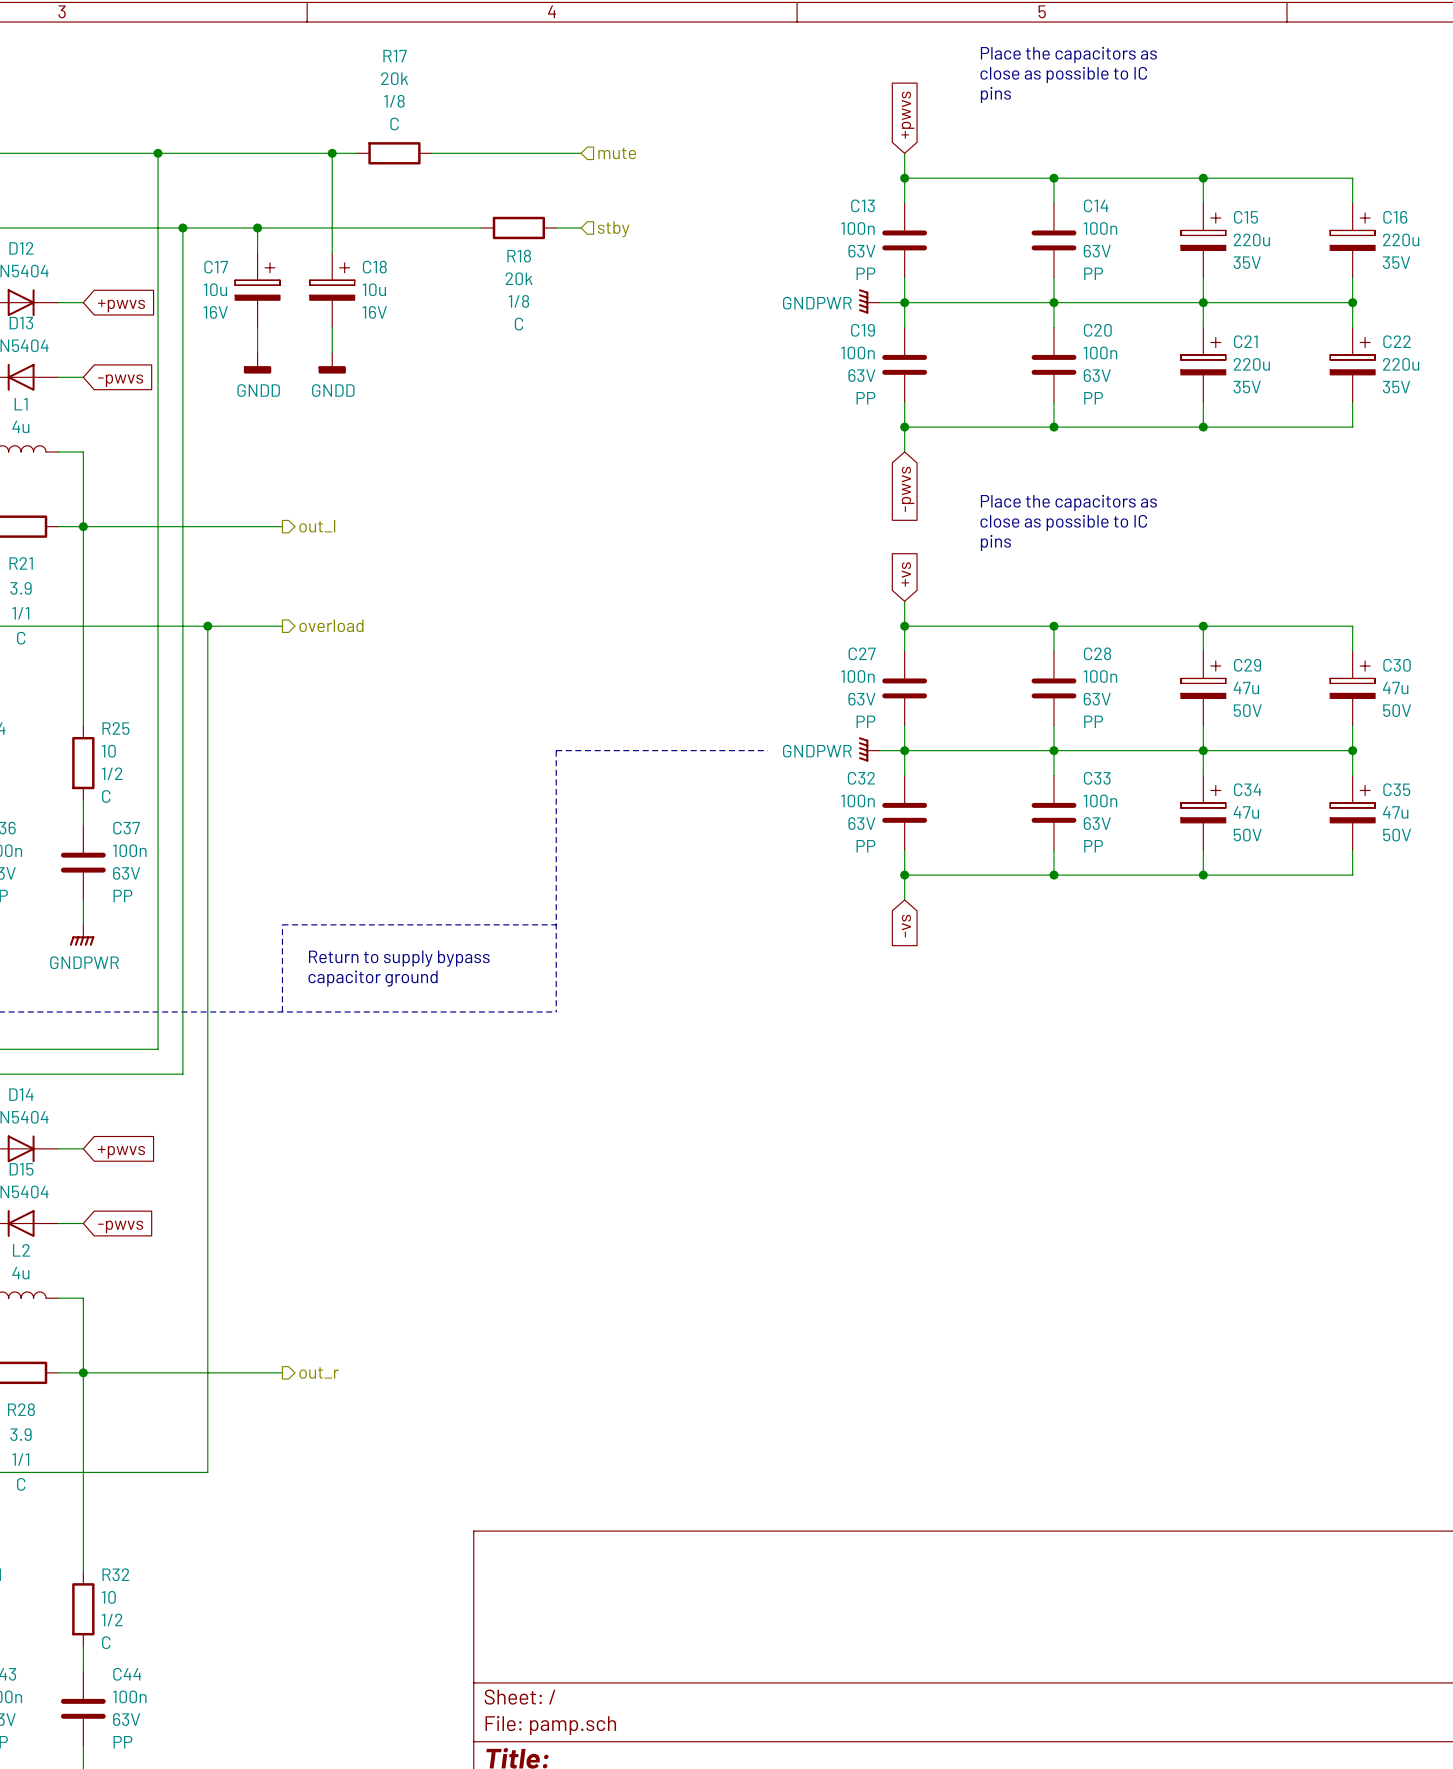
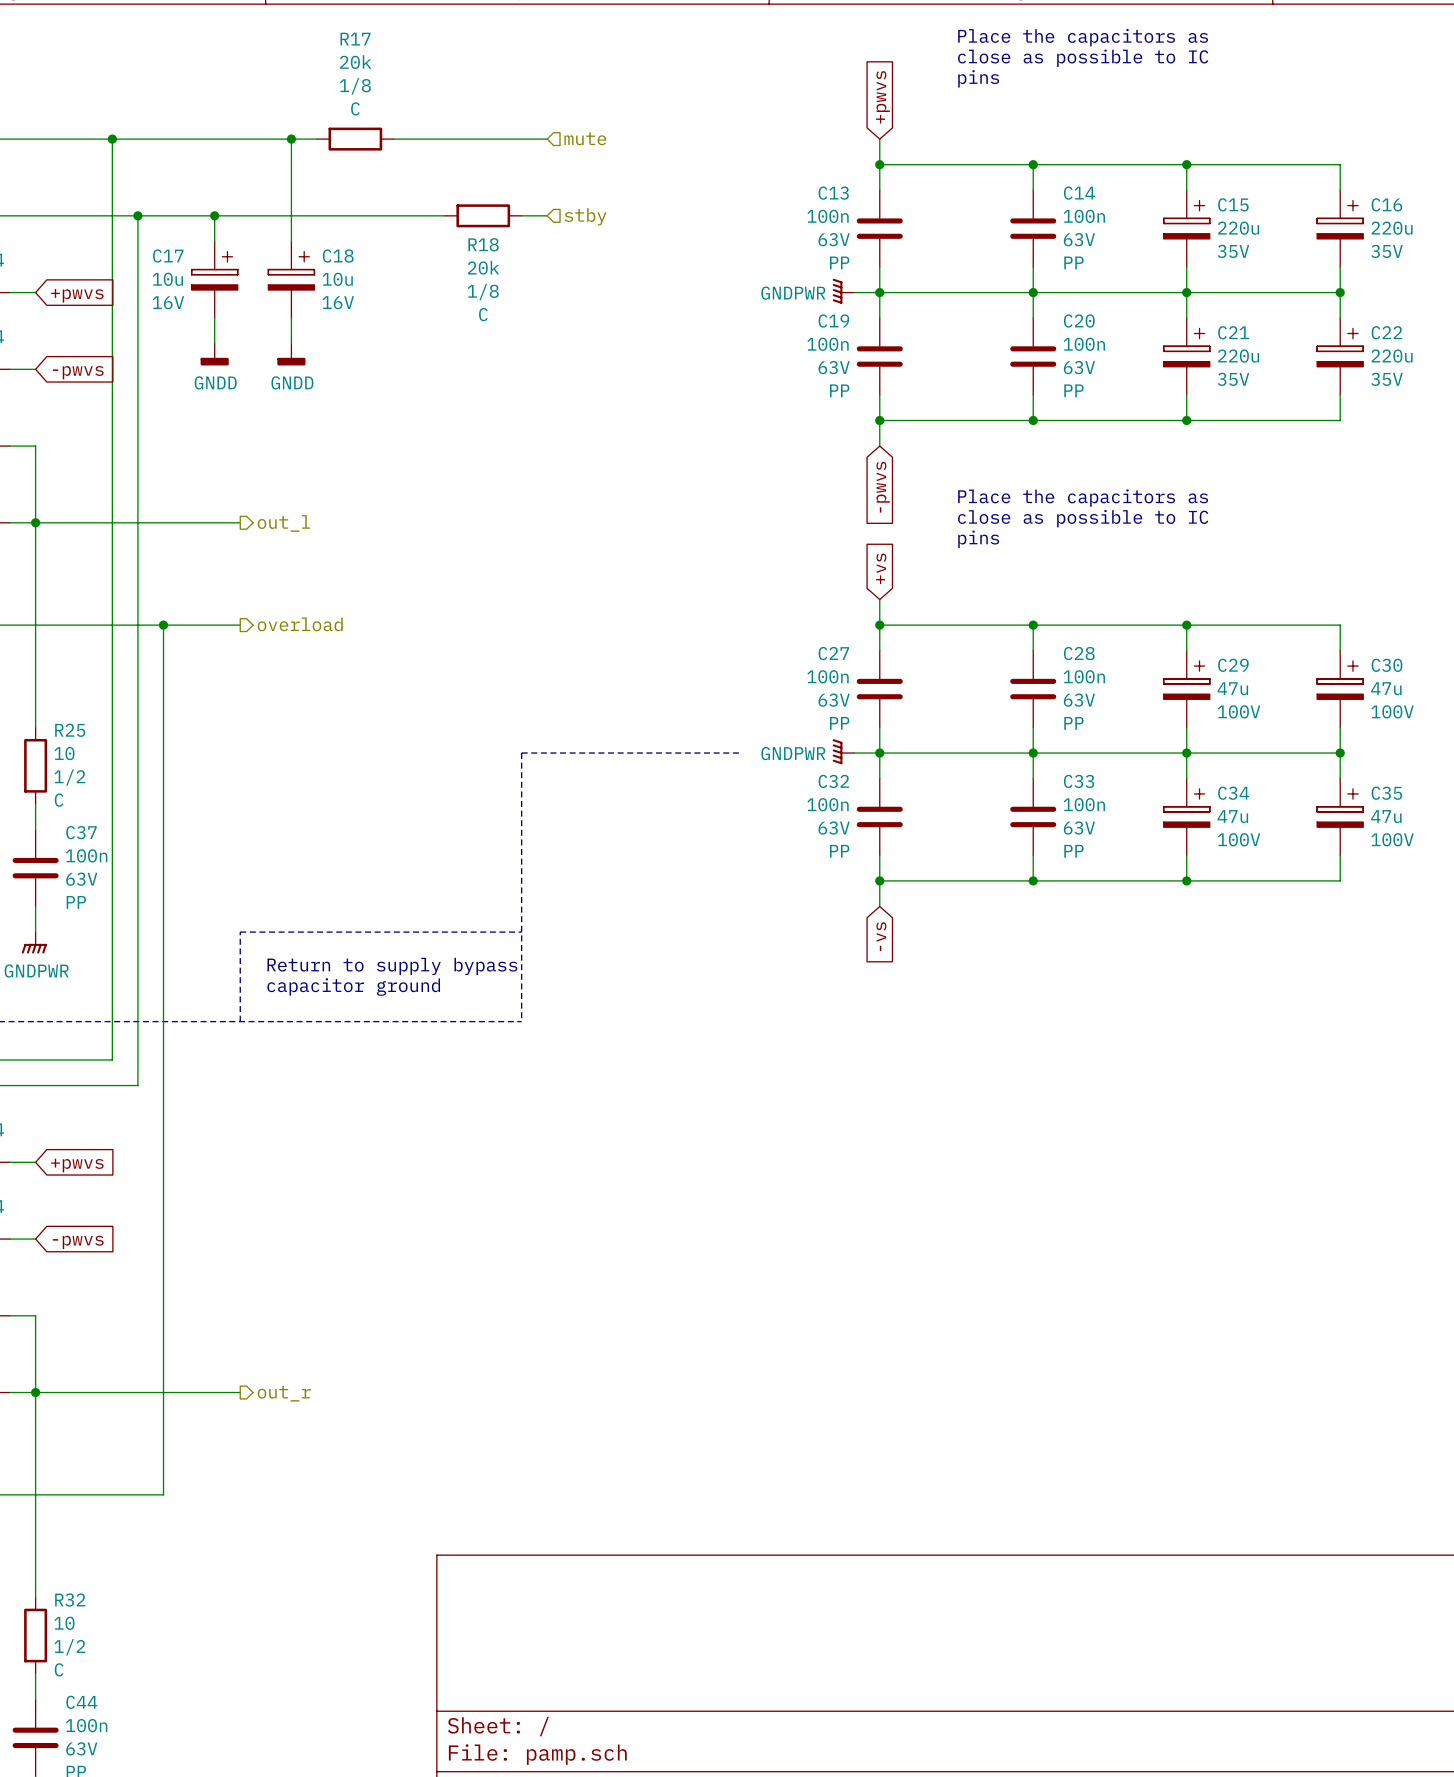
C29 text: 50V (1247, 710) -> 100V (1239, 711)
C30 text: 50V (1397, 710) -> 100V (1392, 711)
C34 text: 50V (1247, 835) -> 100V (1239, 839)
C35 text: 50V (1397, 835) -> 100V (1392, 839)

